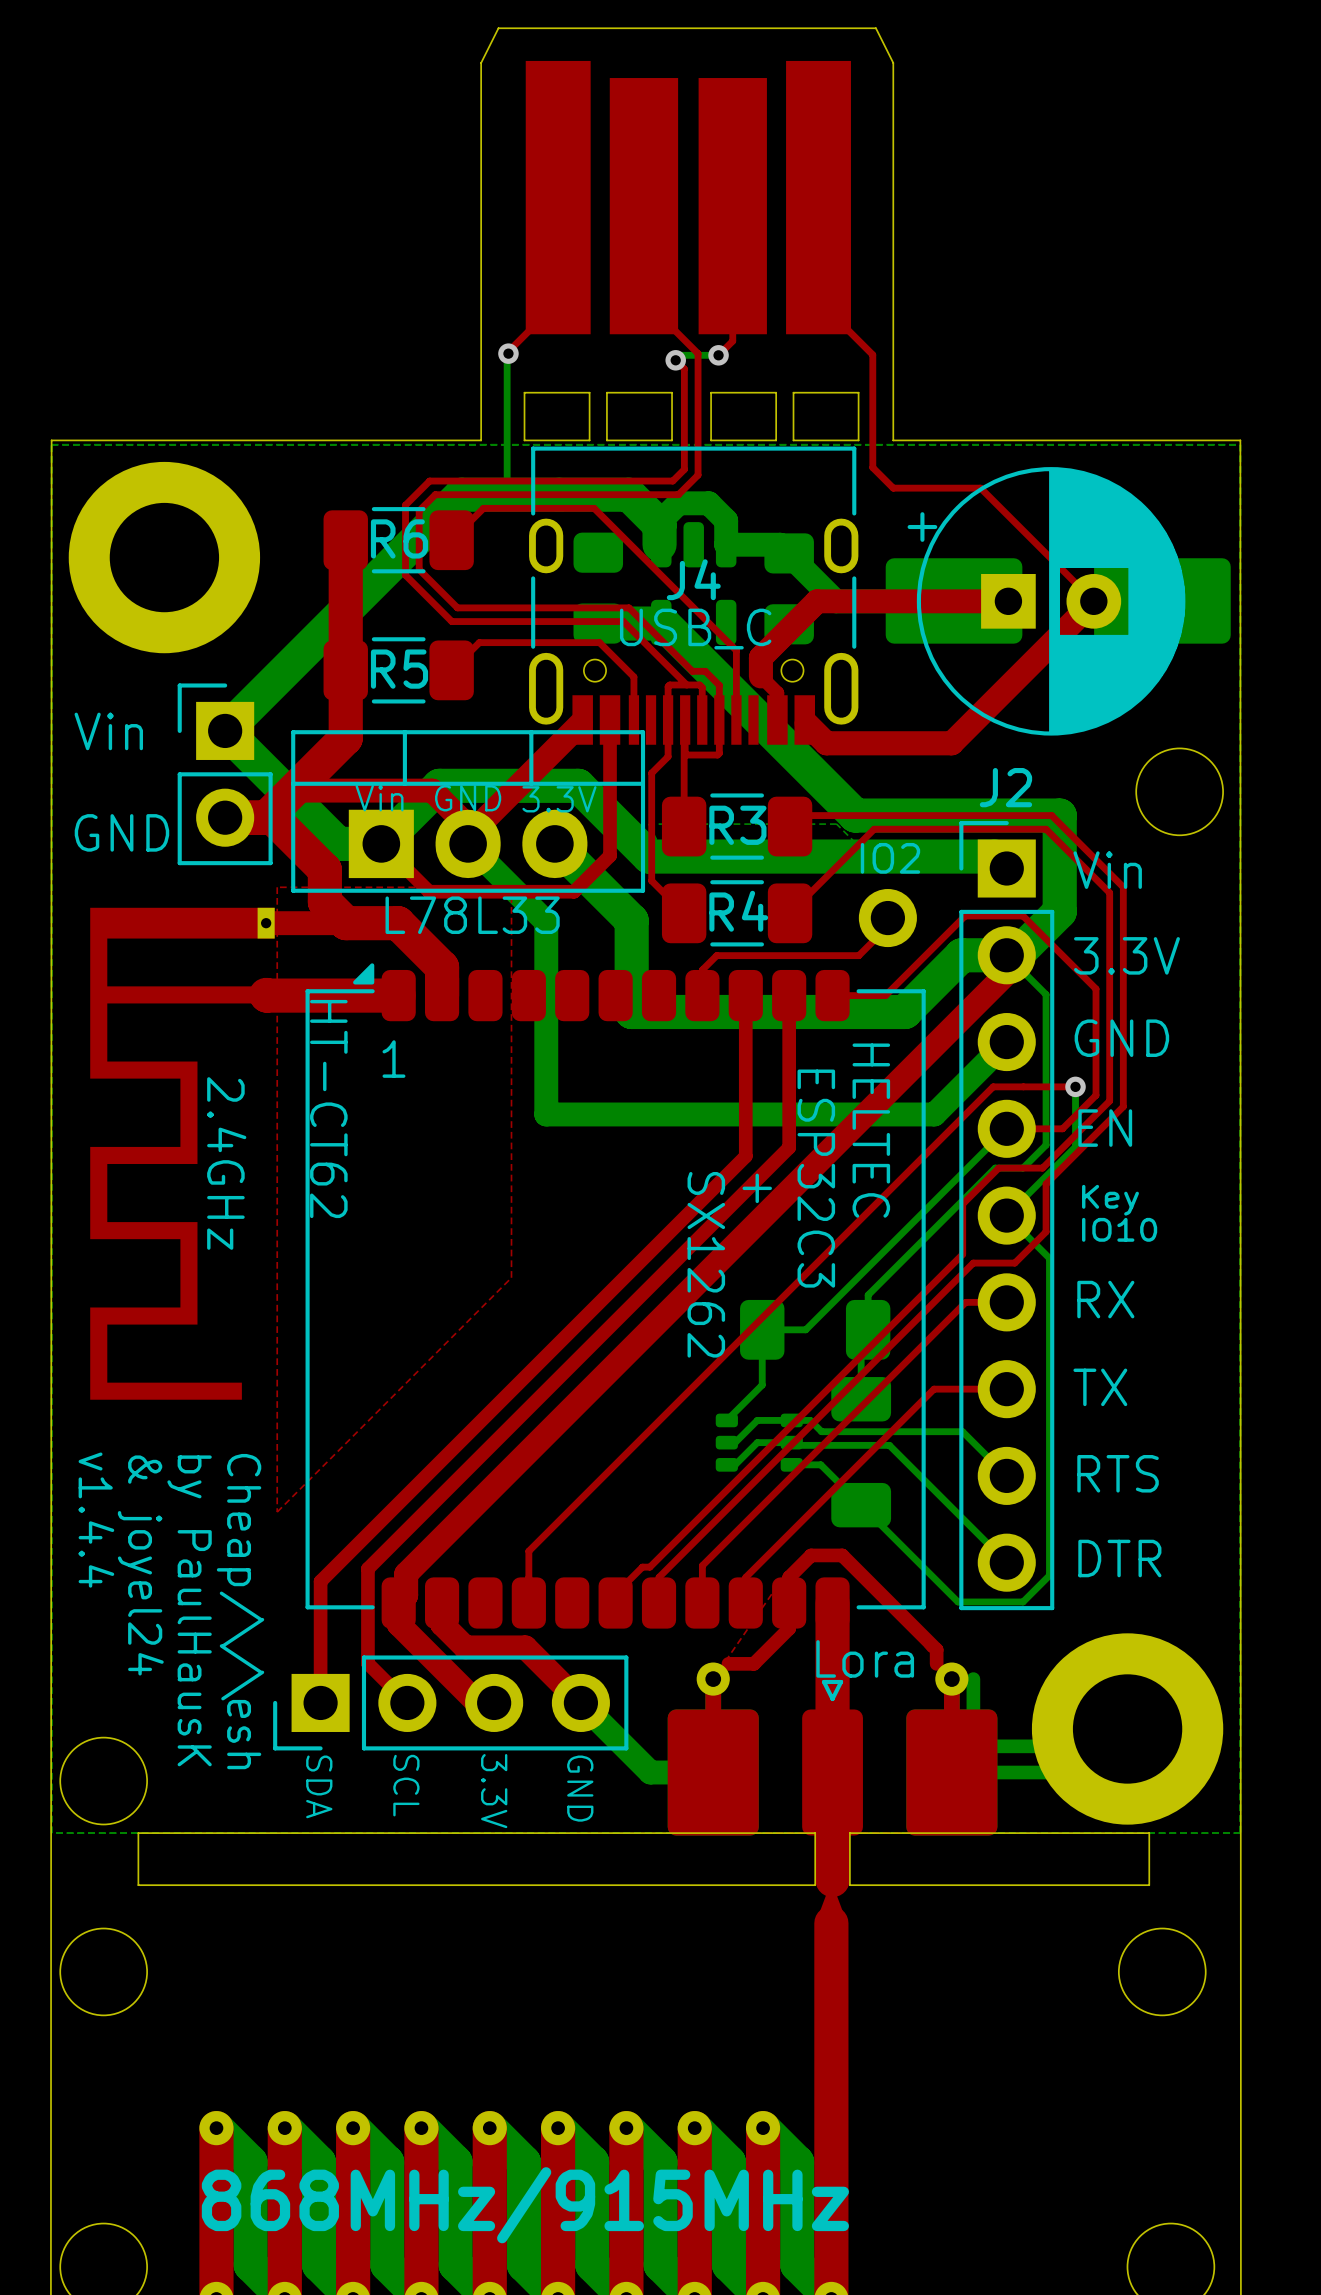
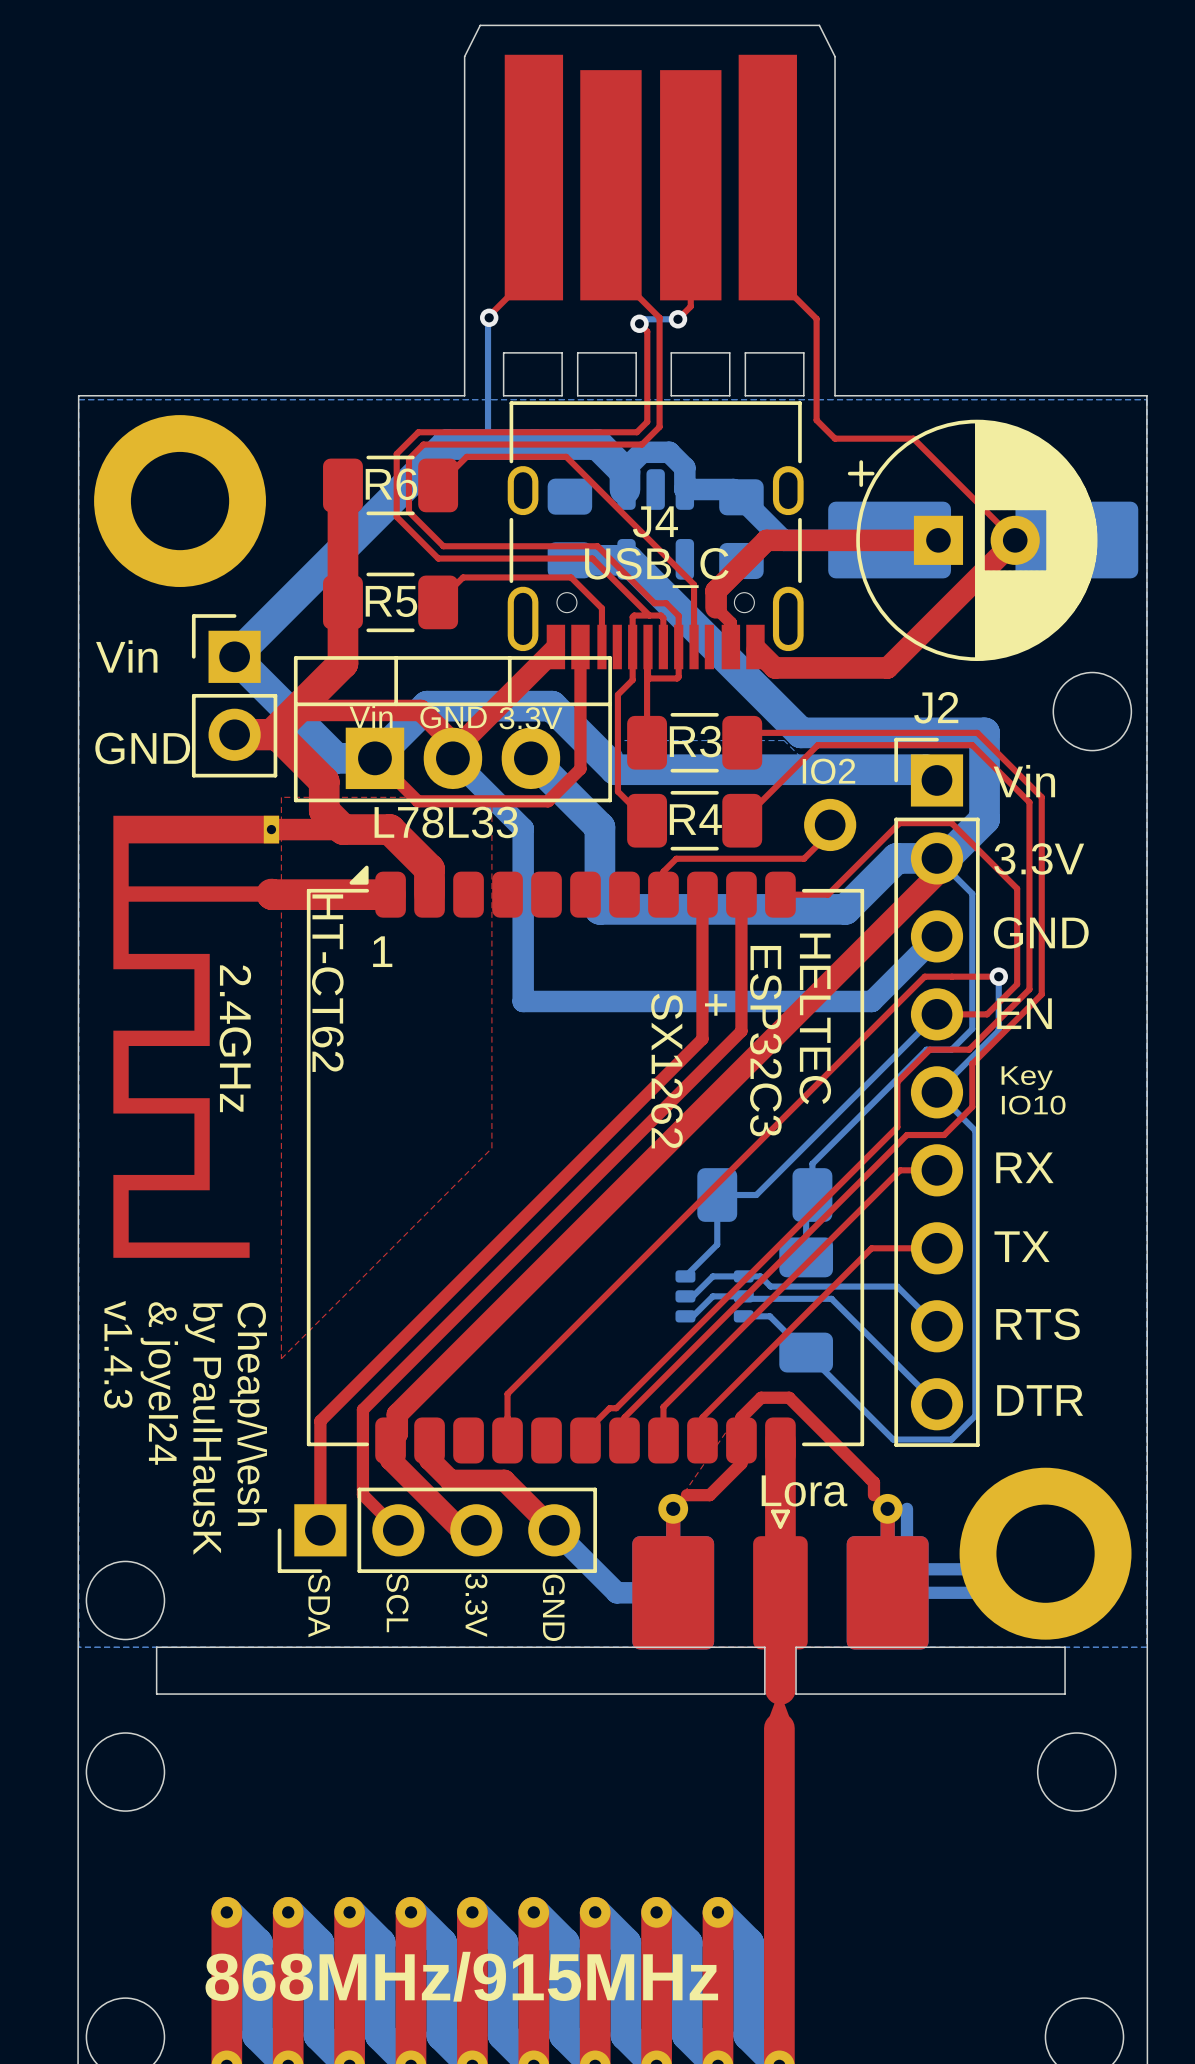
text: v1.4.4 (96, 1520) -> v1.4.3 (118, 1354)

